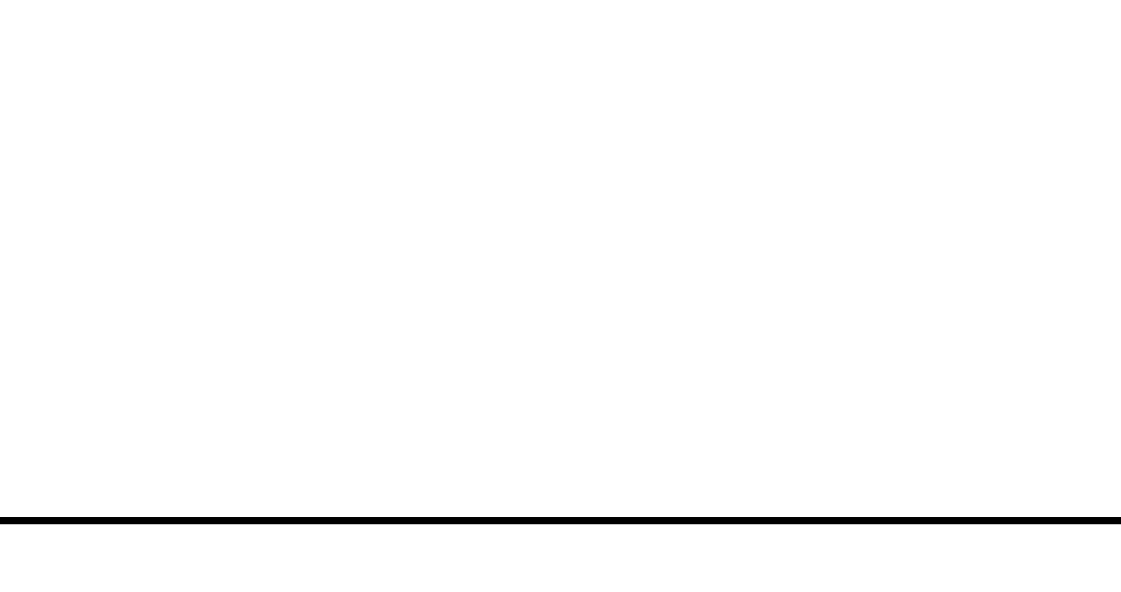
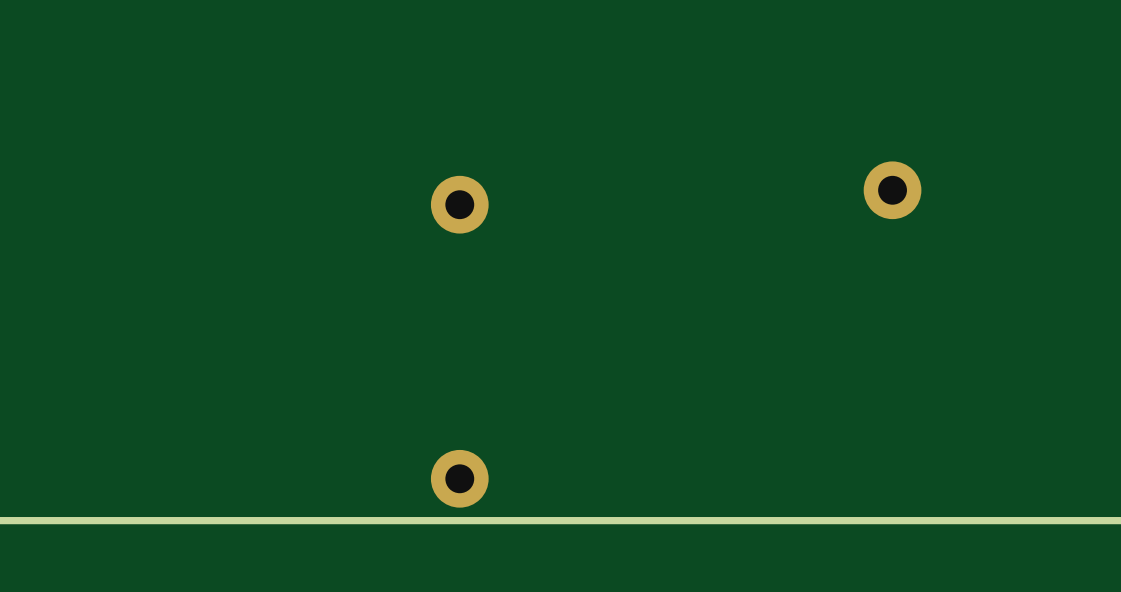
via: none -> (892, 190)
via: none -> (459, 204)
via: none -> (459, 478)

